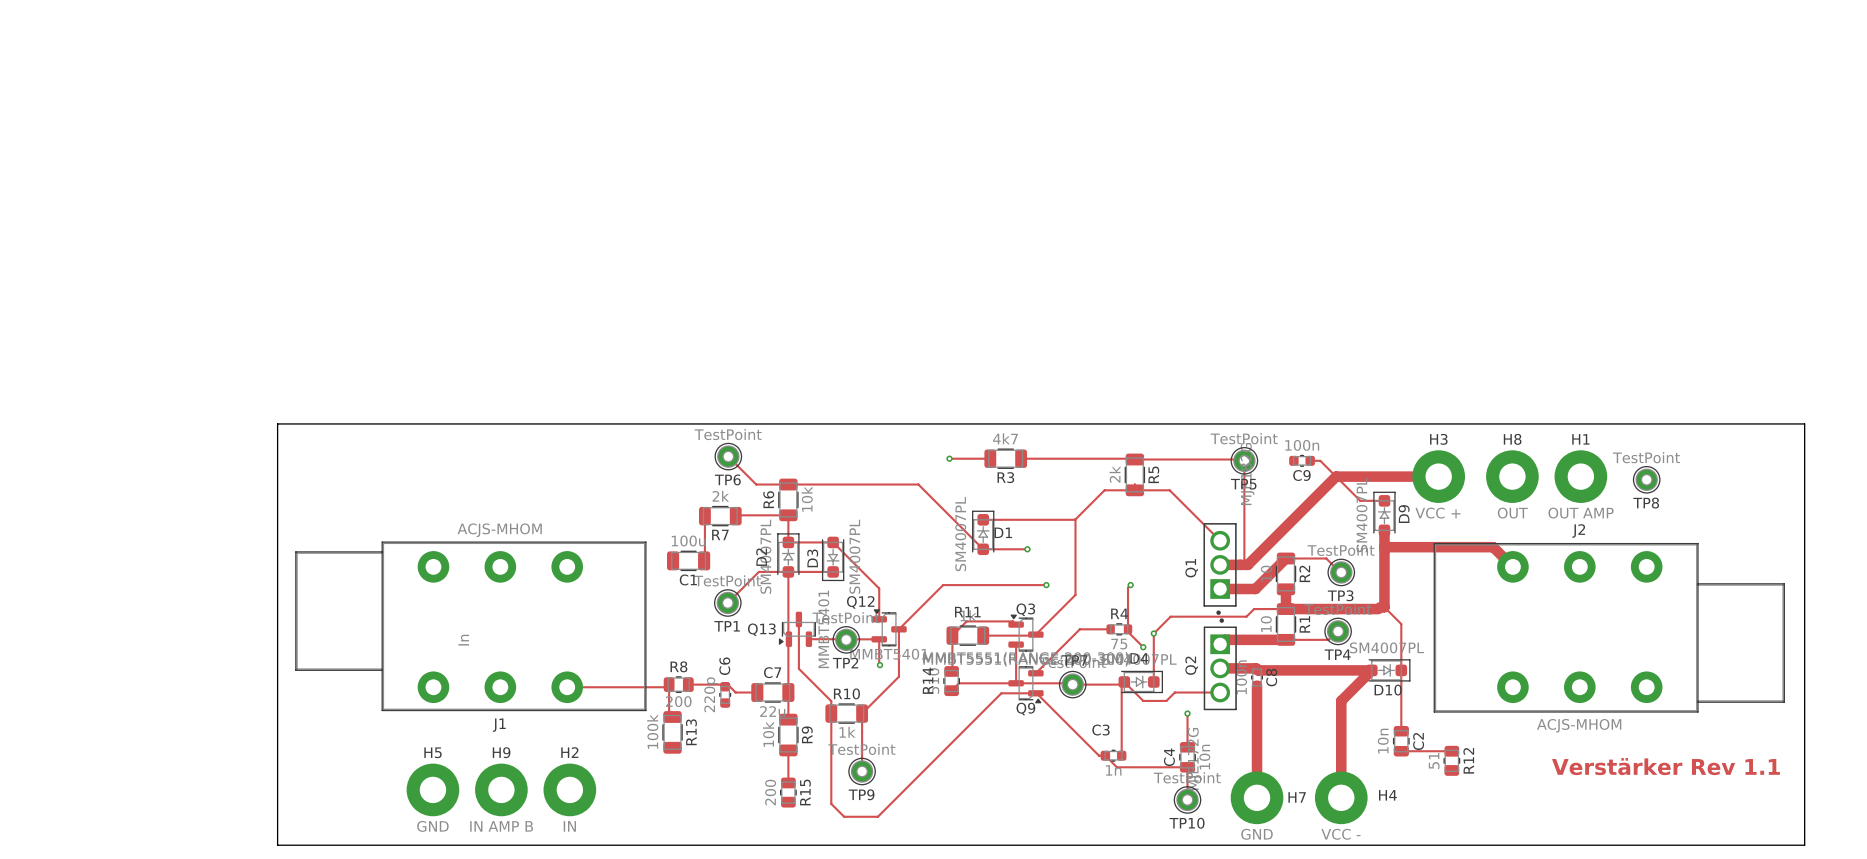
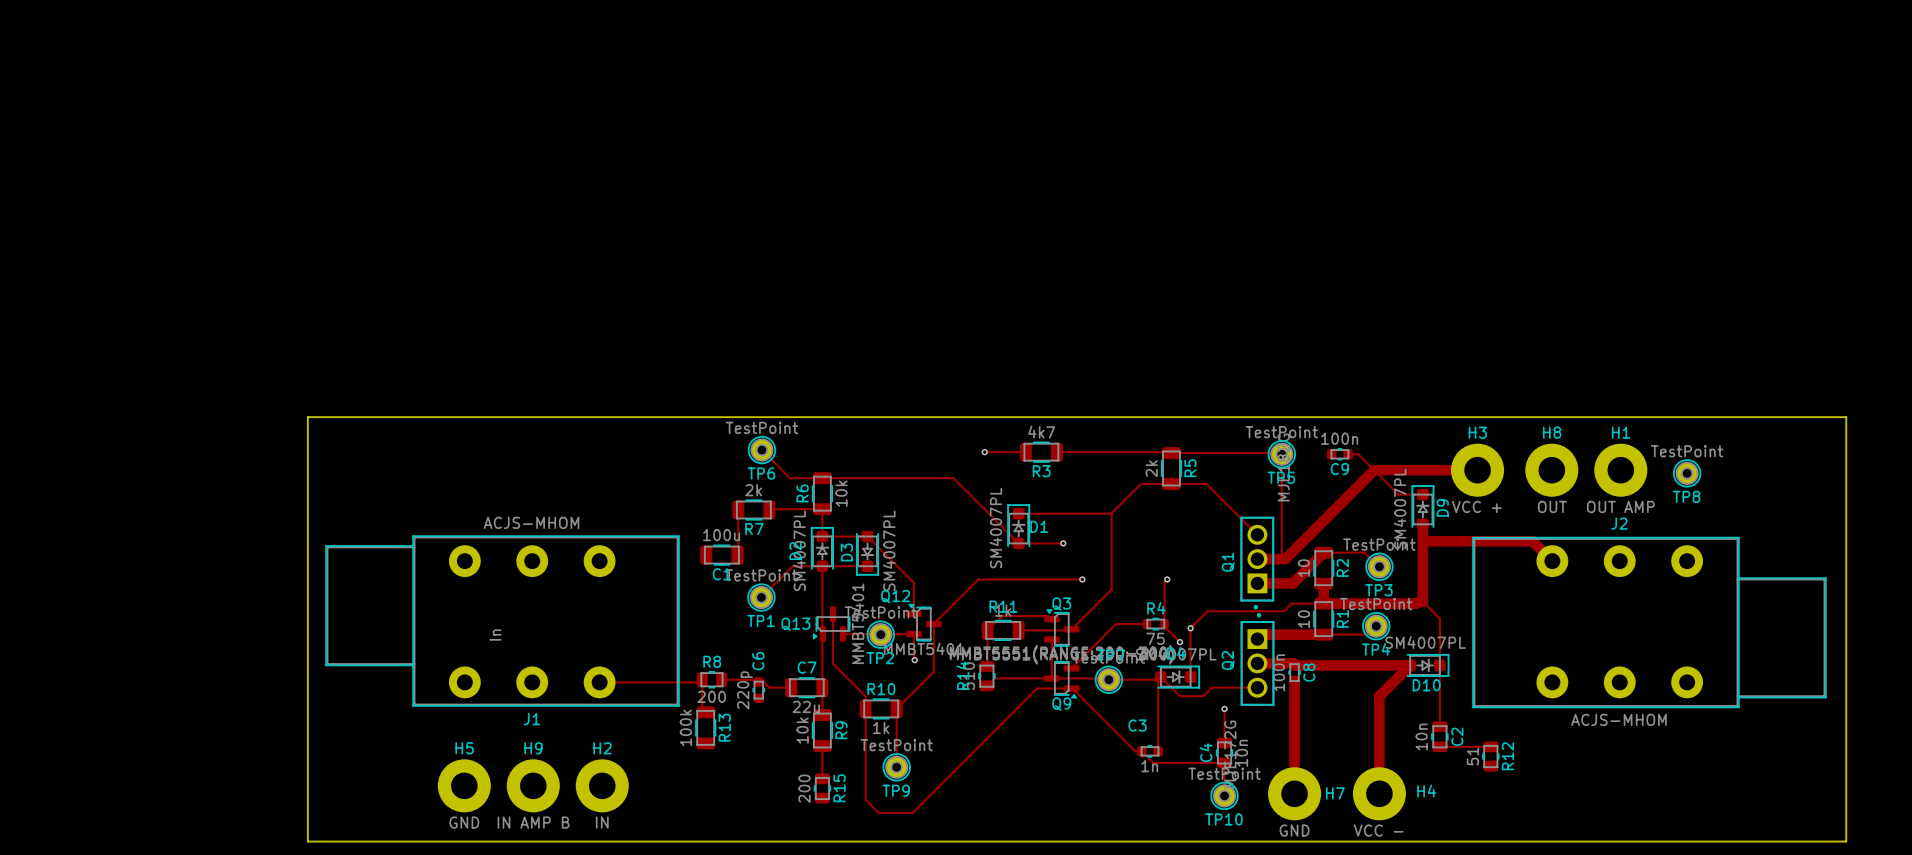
text: Verstärker Rev 1.1 (1665, 766) -> none

